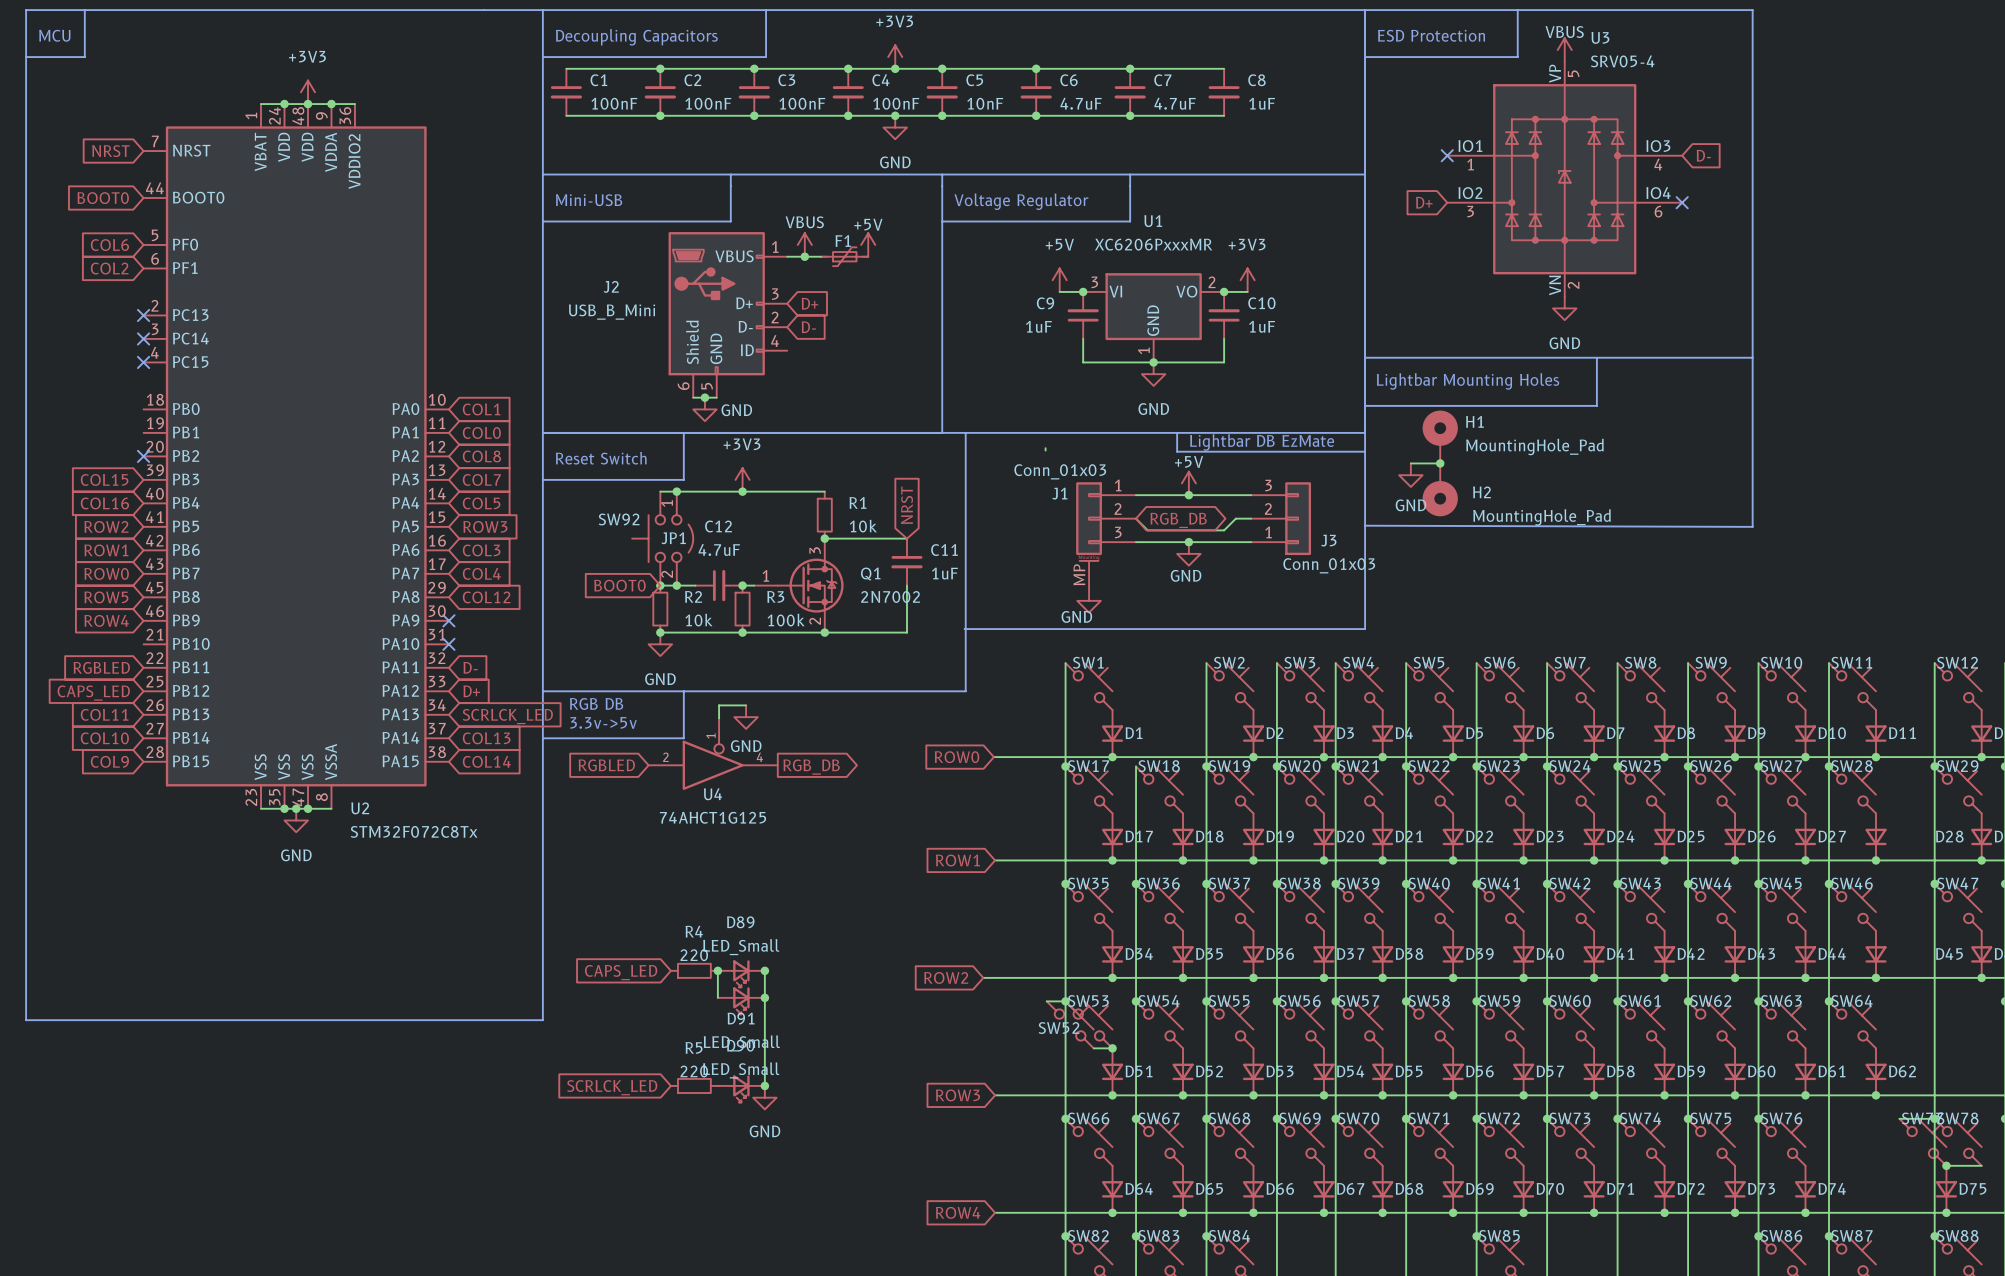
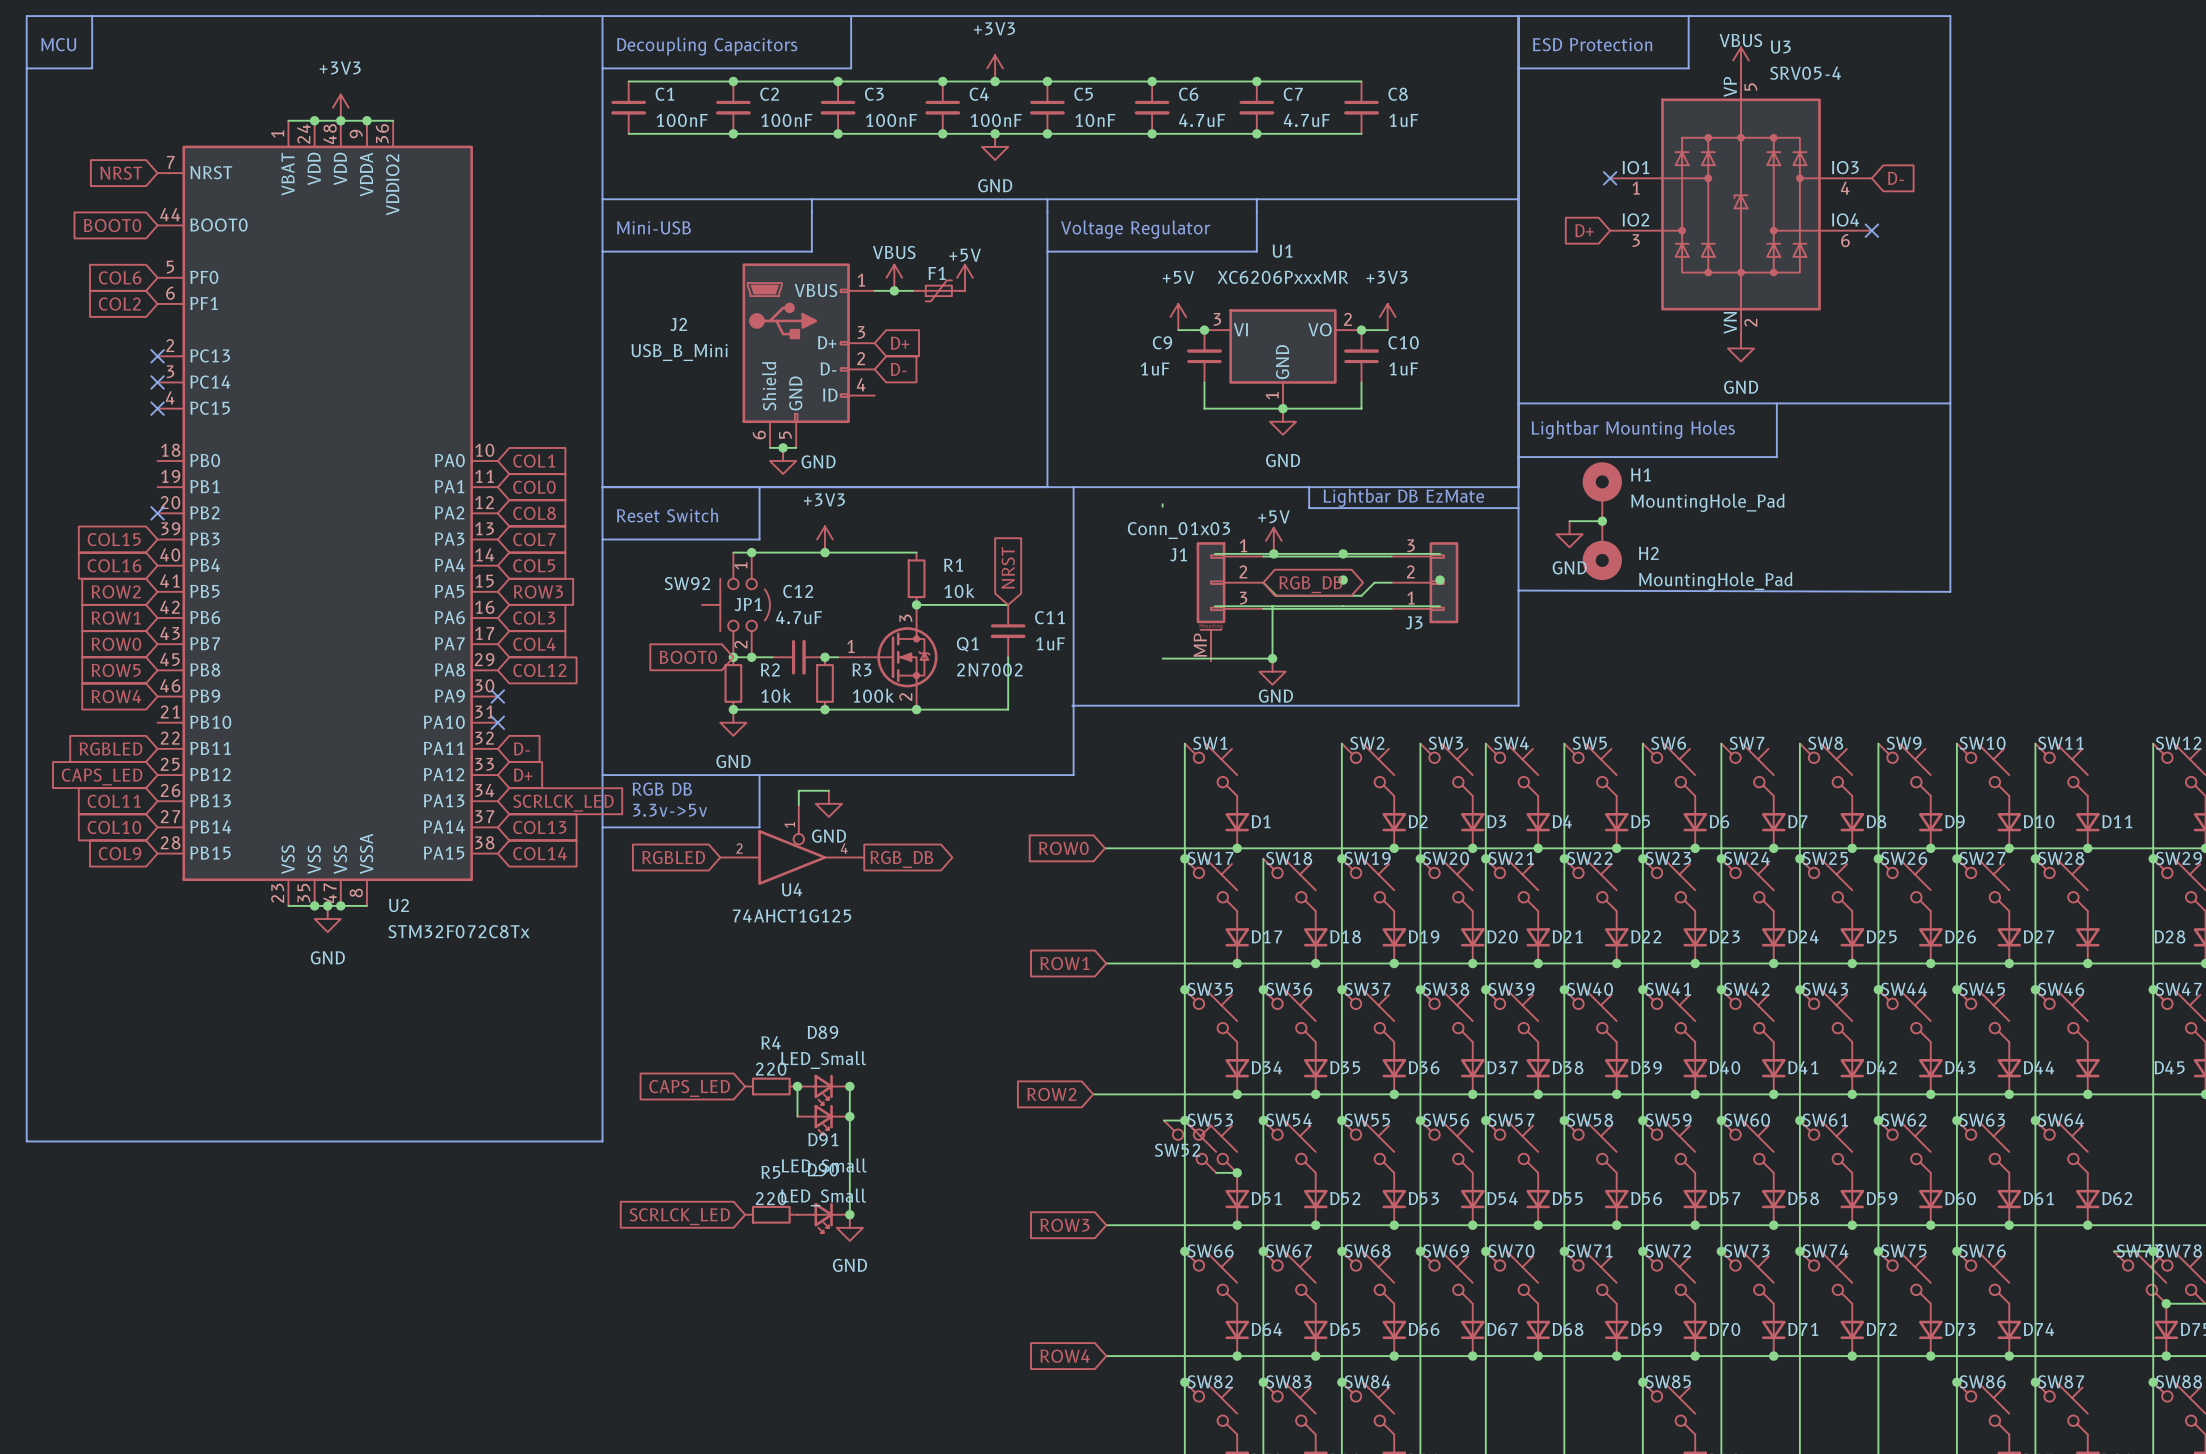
power symbol position: +5V (1188, 483) -> +5V (1273, 540)
wire: none -> (1214, 553) (1440, 553)
junction: none -> (1273, 553)
junction: none -> (1343, 553)
junction: (1188, 495) -> none
junction: none -> (1343, 580)
junction: none -> (1440, 580)
wire: none -> (1214, 606) (1440, 606)
wire: none -> (1272, 606) (1272, 658) (1162, 658)
J3 name position: J3 (1328, 540) -> J3 (1414, 622)
junction: (1188, 542) -> none
power symbol: GND (1188, 553) -> none
J3 value: Conn_01x03 (1329, 565) -> none
junction: none -> (1272, 658)
power symbol: none -> GND (1272, 671)
power symbol: GND (1089, 600) -> none

